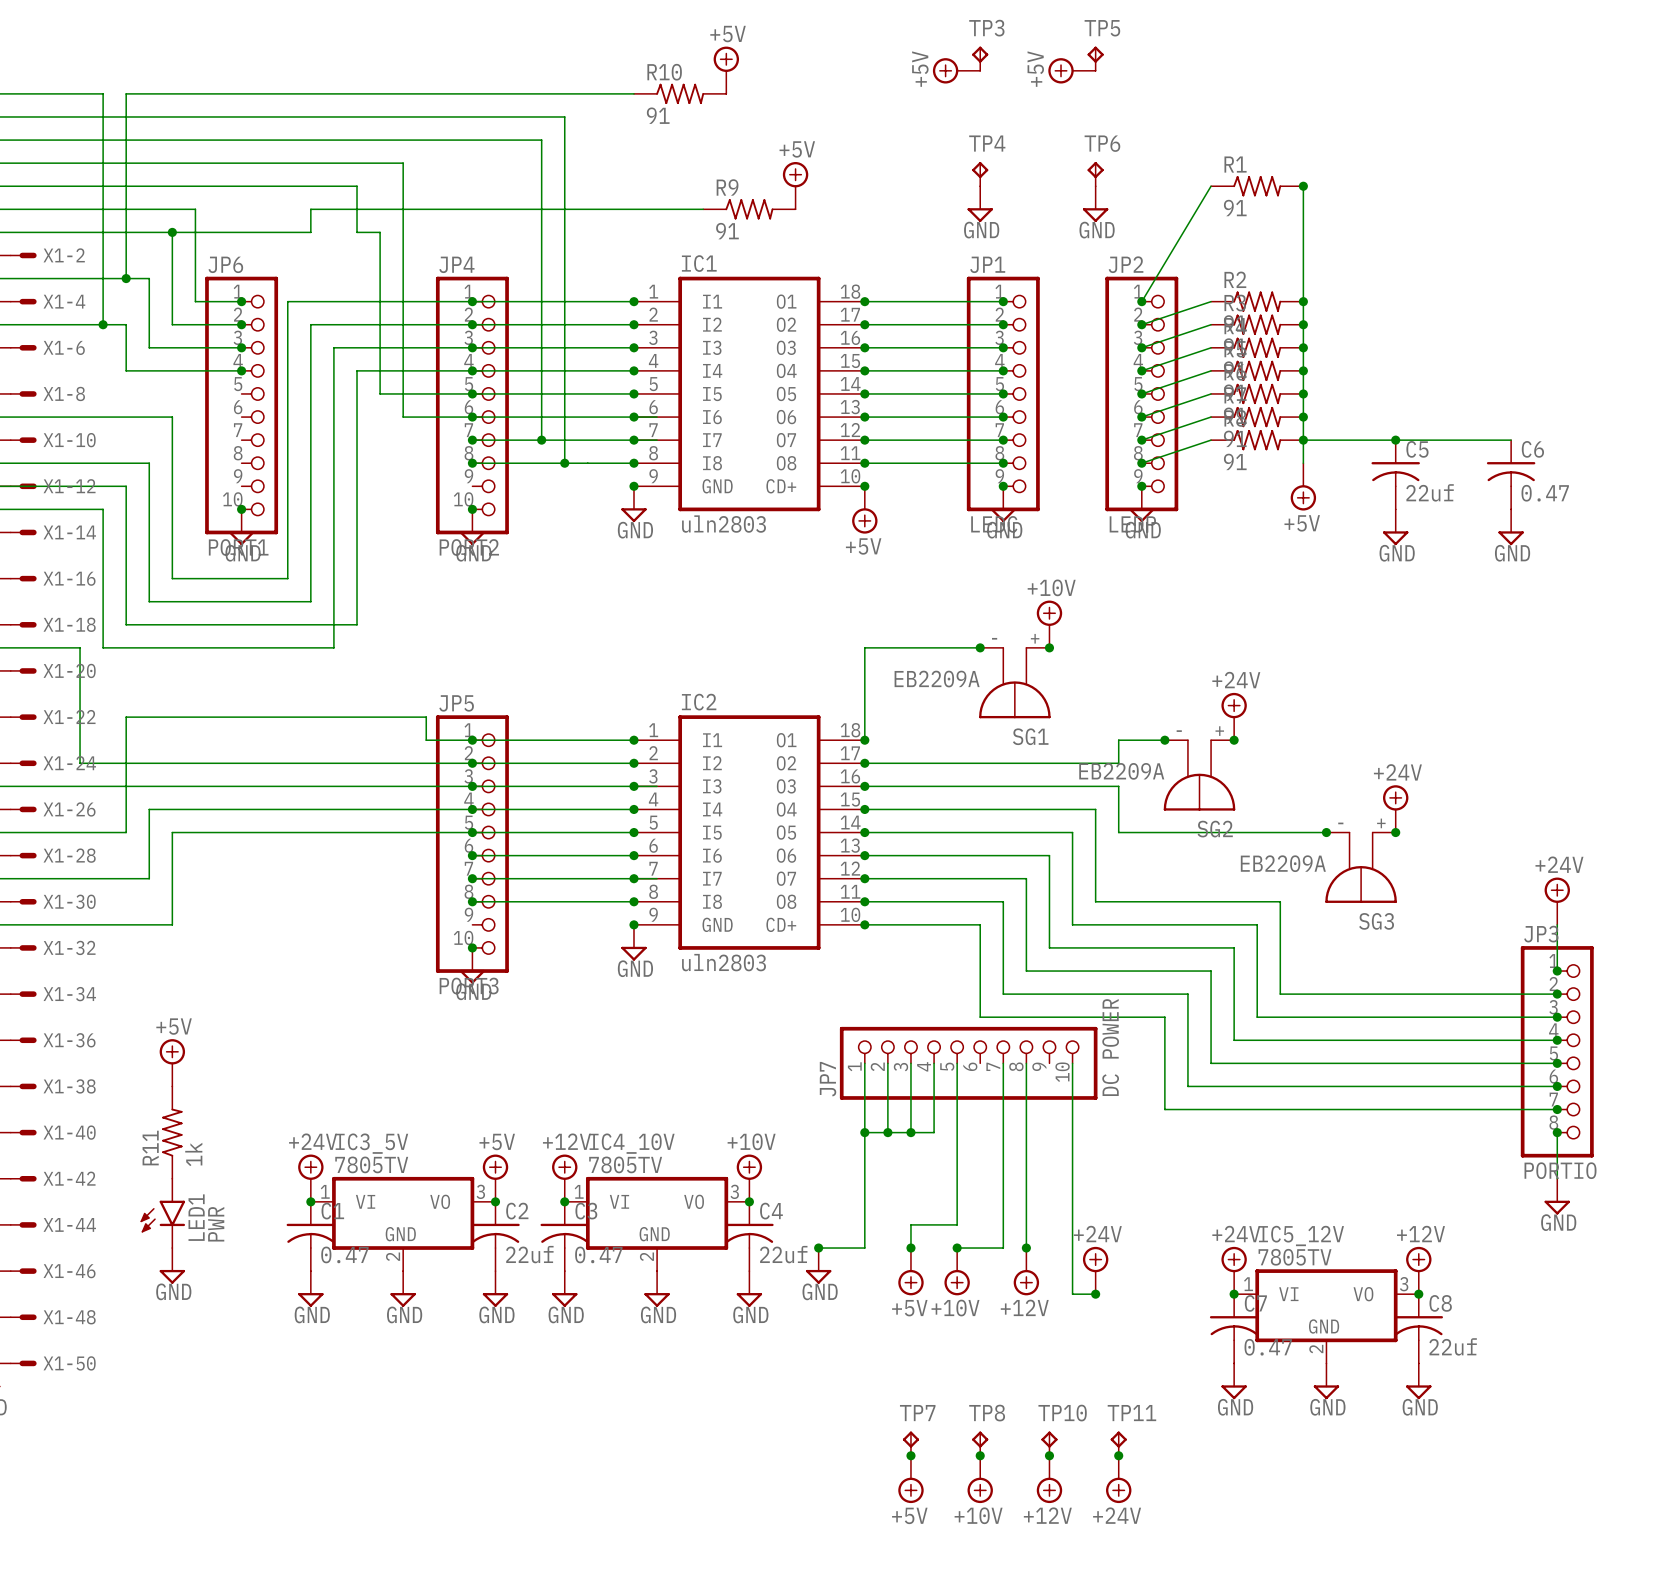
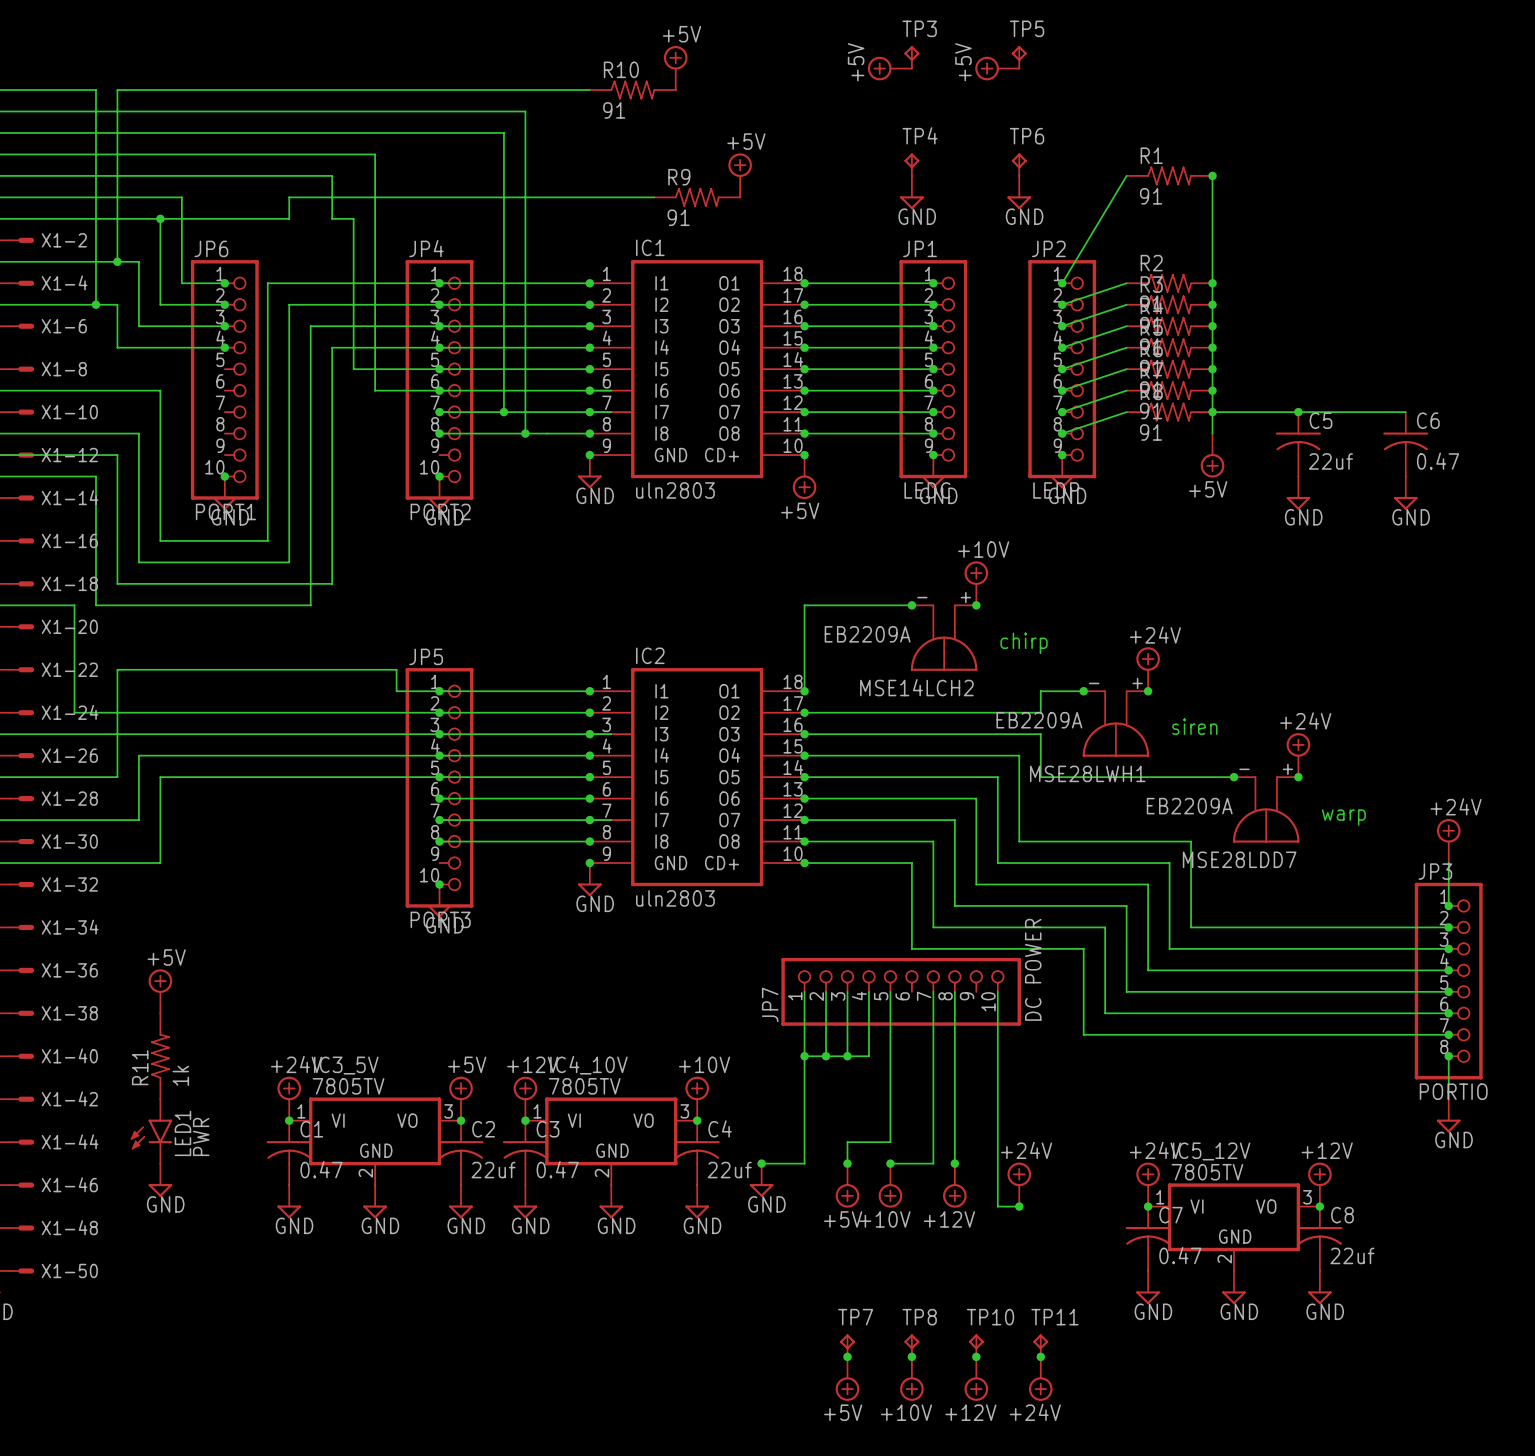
text: none -> chirp (1024, 643)
SG1 name: SG1 (1030, 736) -> MSE14LCH2 (916, 687)
text: none -> siren (1194, 726)
SG2 name: SG2 (1215, 829) -> MSE28LWH1 (1087, 773)
text: none -> warp (1343, 817)
SG3 name: SG3 (1376, 921) -> MSE28LDD7 (1239, 859)

